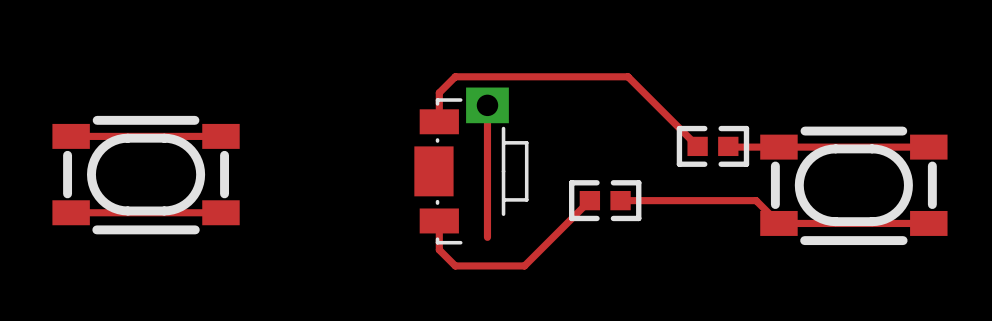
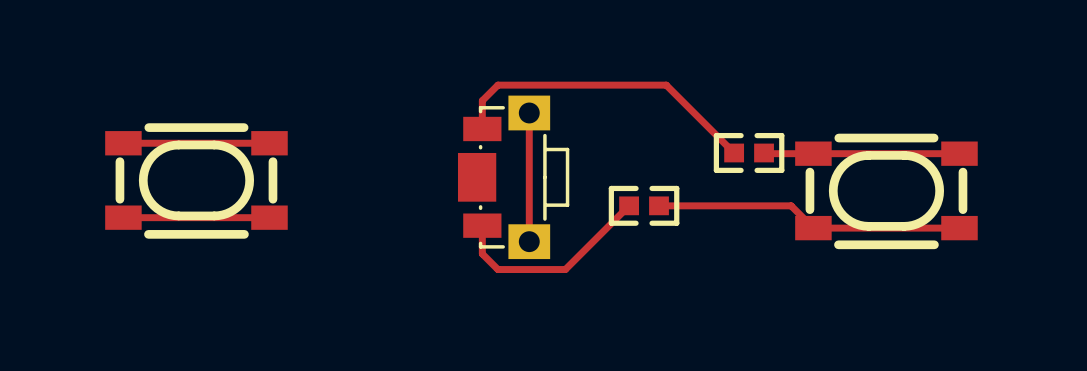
part footprint: [414, 87, 529, 245] -> [457, 95, 570, 260]

